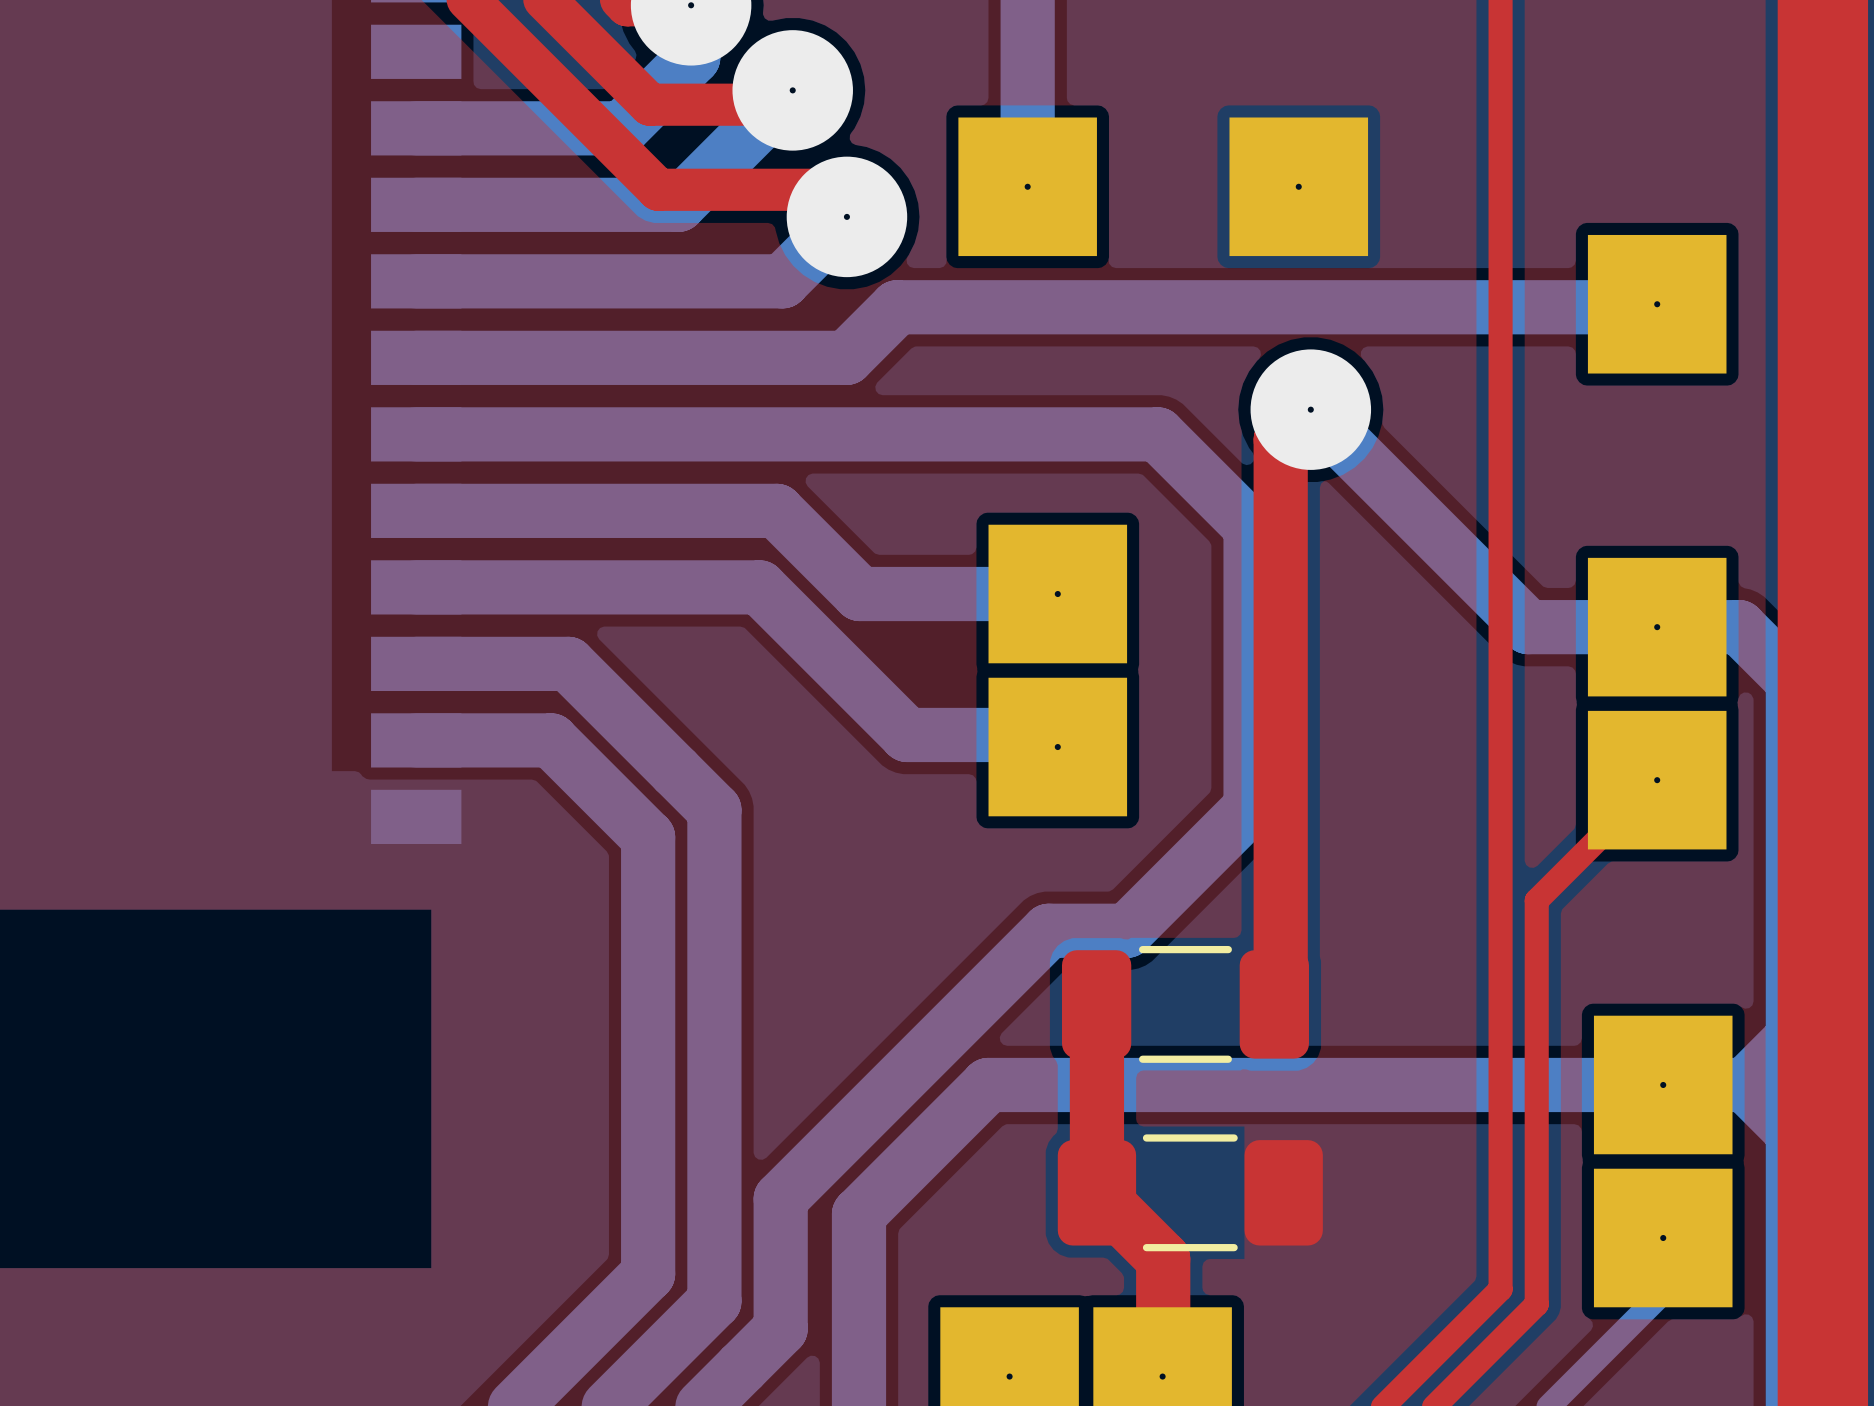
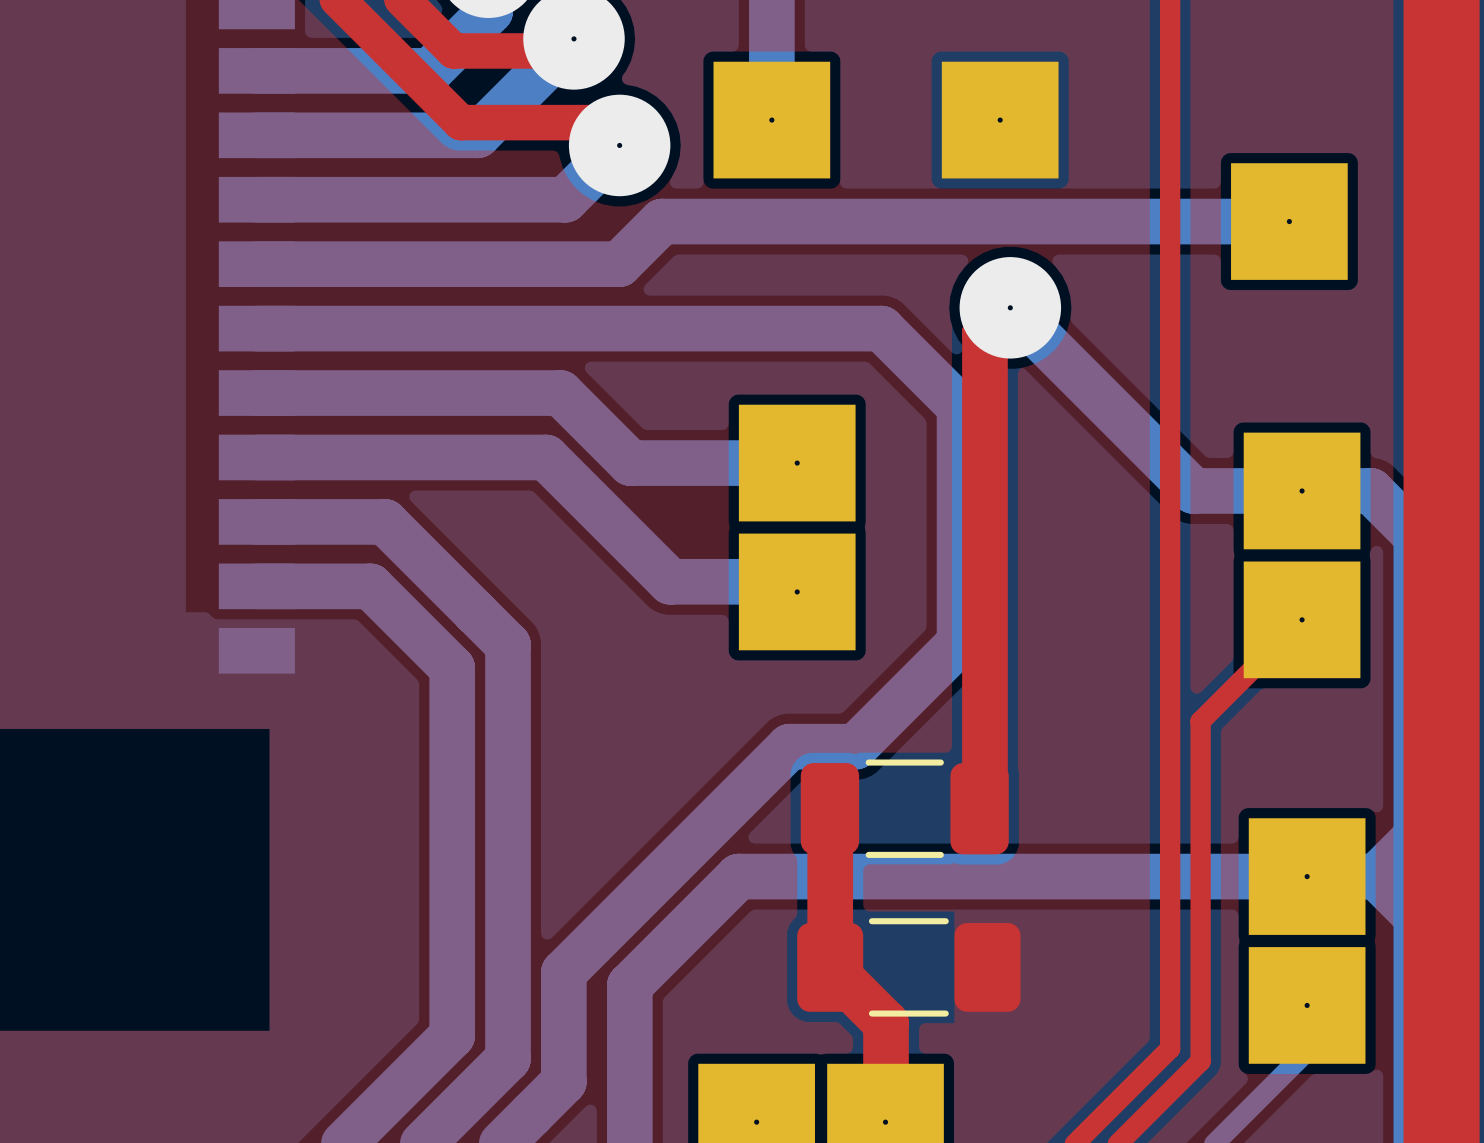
part position: (1657, 304) -> (1289, 221)

